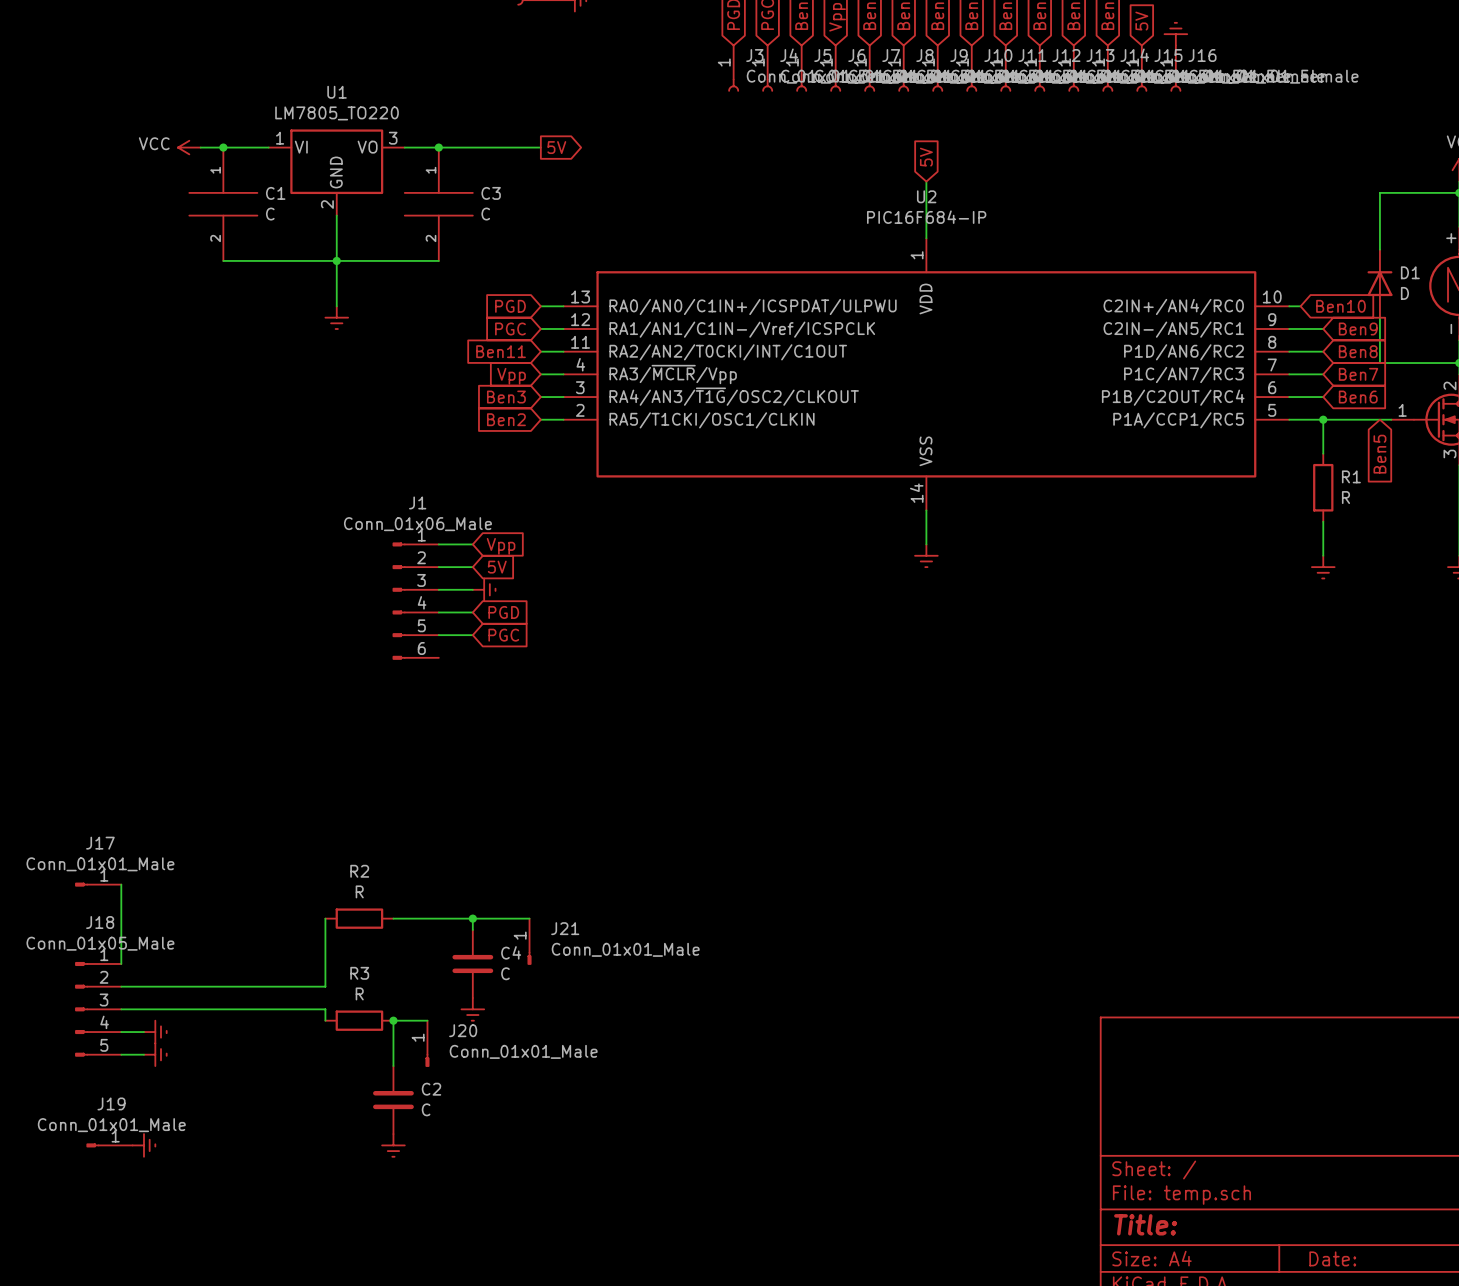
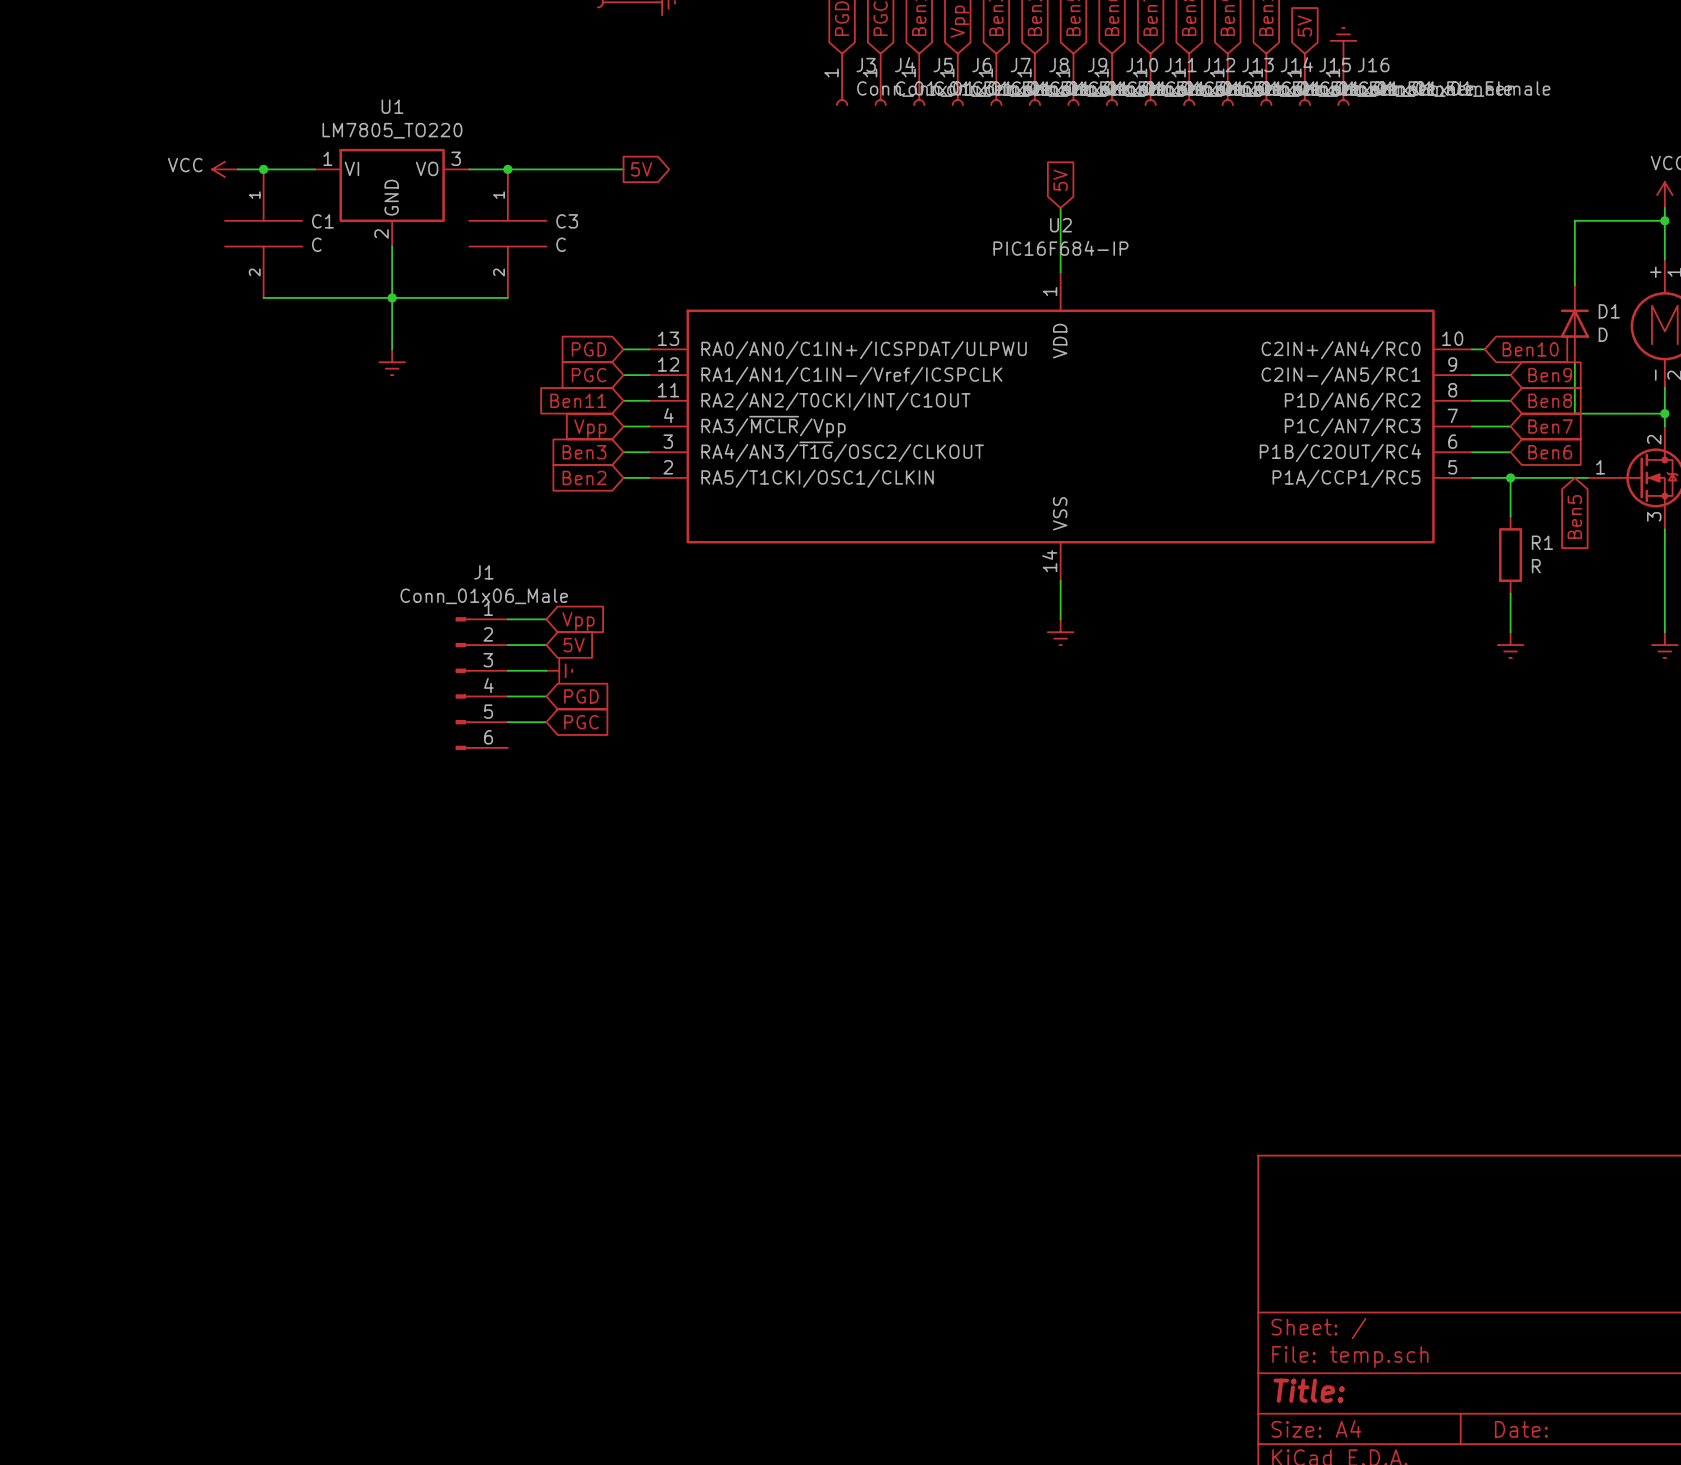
J17: Conn_01x01_Male (98, 884) -> none
wire: (121, 884) (121, 963) -> none
wire: (325, 918) (325, 986) (121, 986) -> none
R2: R (359, 918) -> none
wire: (393, 918) (529, 918) -> none
wire: (472, 918) (472, 929) -> none
junction: (472, 918) -> none
J21: Conn_01x01_Male (529, 941) -> none
C4: C (472, 963) -> none
J18: Conn_01x05_Male (98, 1009) -> none
wire: (121, 1009) (325, 1009) (325, 1020) -> none
power symbol: (472, 1009) -> none
R3: R (359, 1020) -> none
junction: (393, 1020) -> none
wire: (427, 1020) (393, 1020) (393, 1066) -> none
wire: (121, 1032) (143, 1032) -> none
power symbol: (155, 1032) -> none
J20: Conn_01x01_Male (427, 1043) -> none
wire: (121, 1054) (143, 1054) -> none
power symbol: (155, 1054) -> none
C2: C (393, 1100) -> none
J19: Conn_01x01_Male (109, 1145) -> none
power symbol: (143, 1145) -> none
power symbol: (393, 1145) -> none

